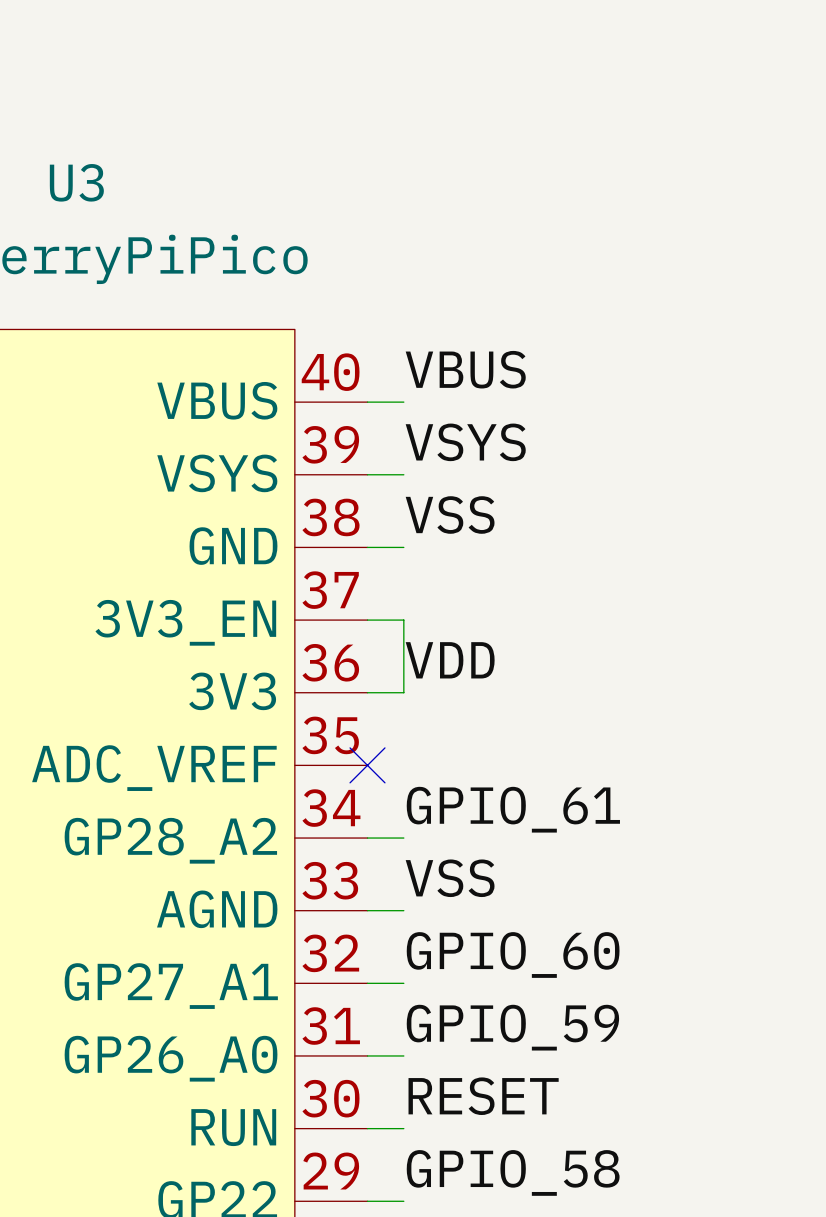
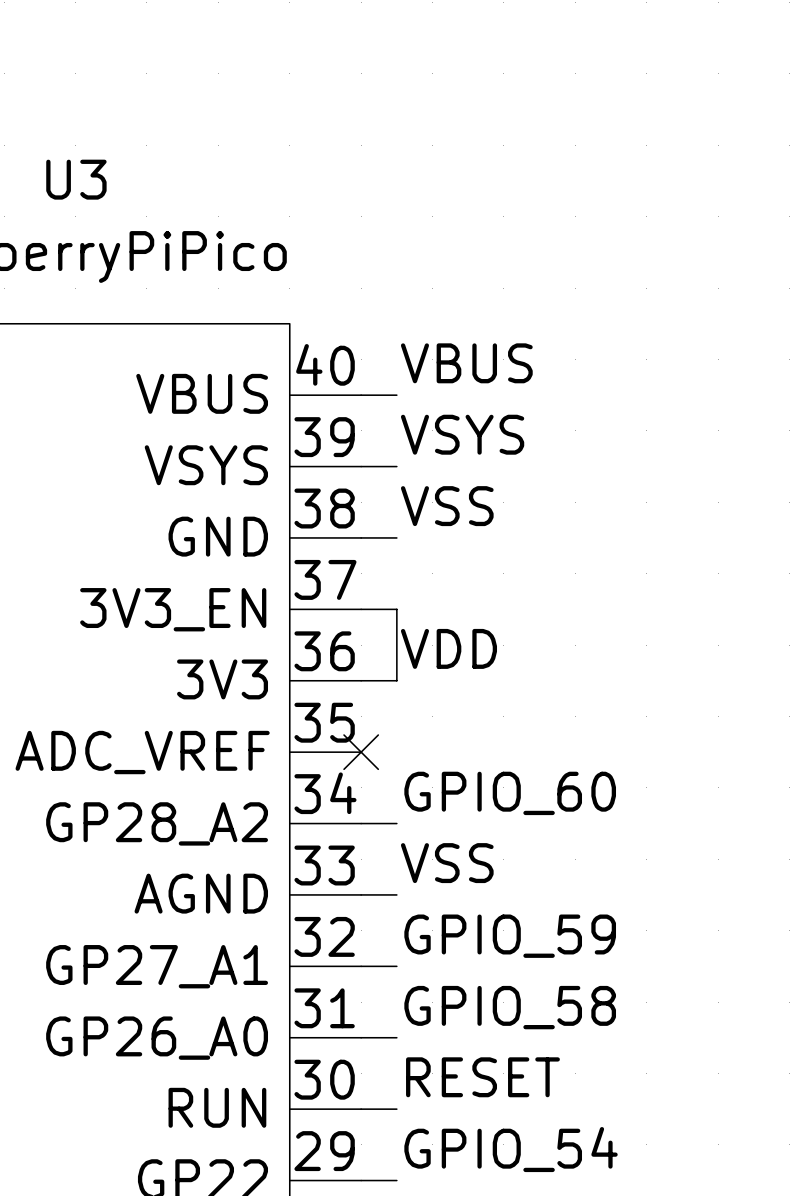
label: GPIO_61 (513, 809) -> GPIO_60 (510, 793)
label: GPIO_60 (513, 955) -> GPIO_59 (510, 936)
label: GPIO_59 (512, 1027) -> GPIO_58 (510, 1007)
label: GPIO_58 (513, 1172) -> GPIO_54 (511, 1149)

